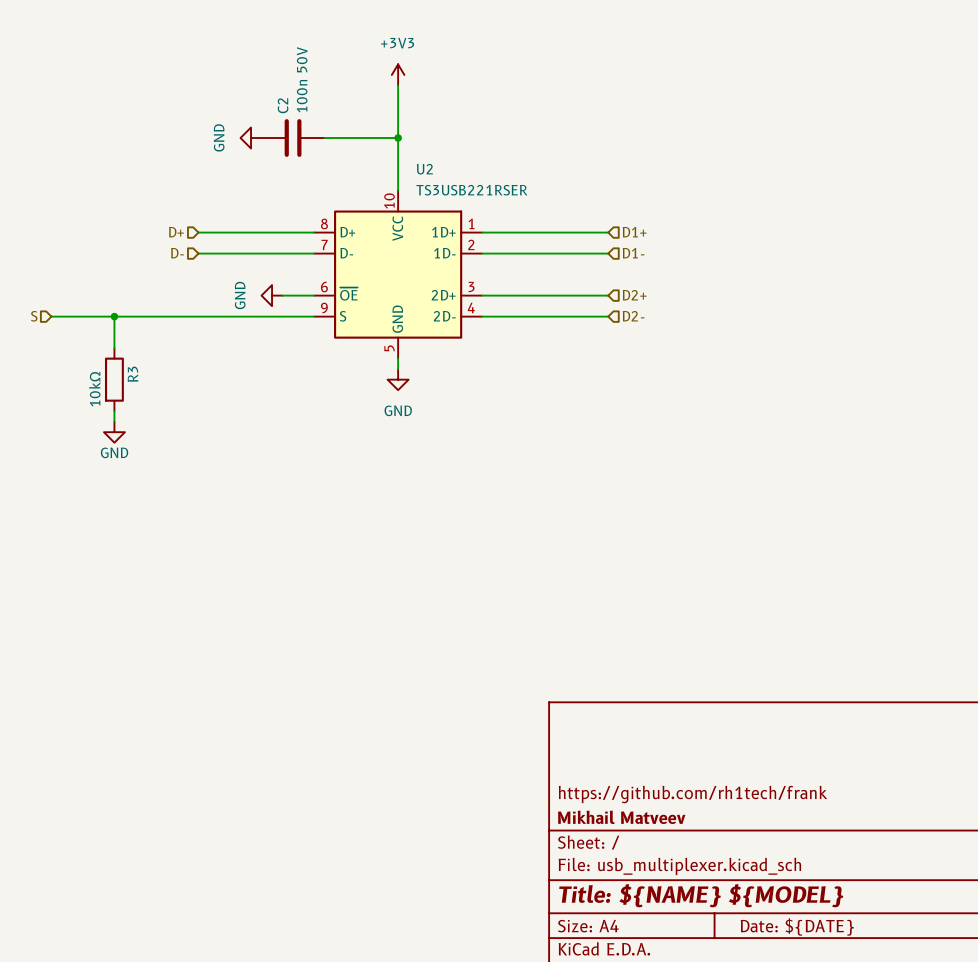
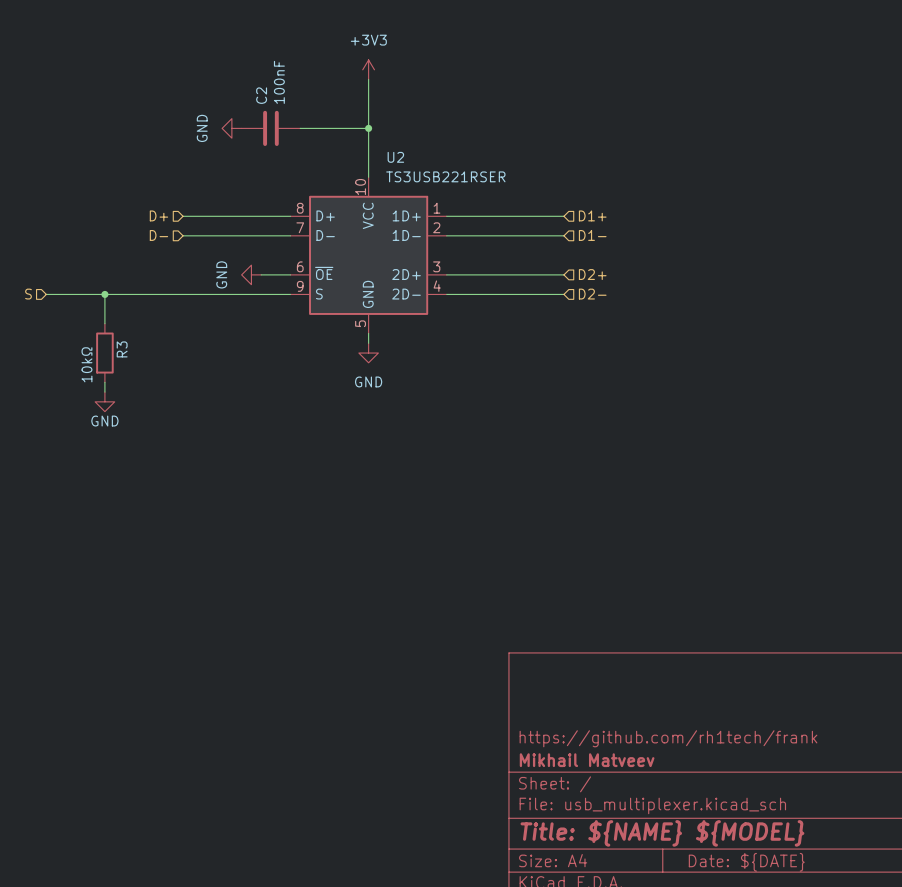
C2 value: 100n 50V (302, 79) -> 100nF (279, 82)

